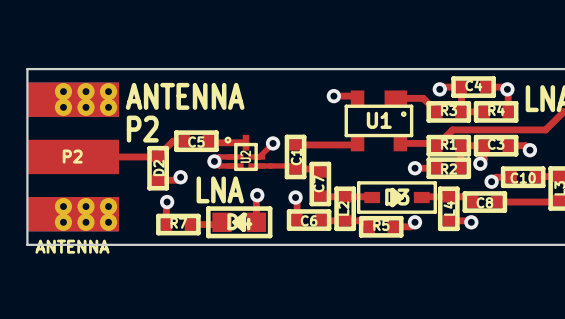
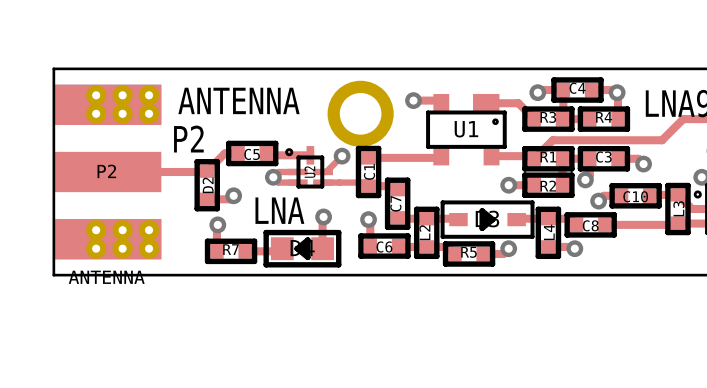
part: none -> (360, 113)

